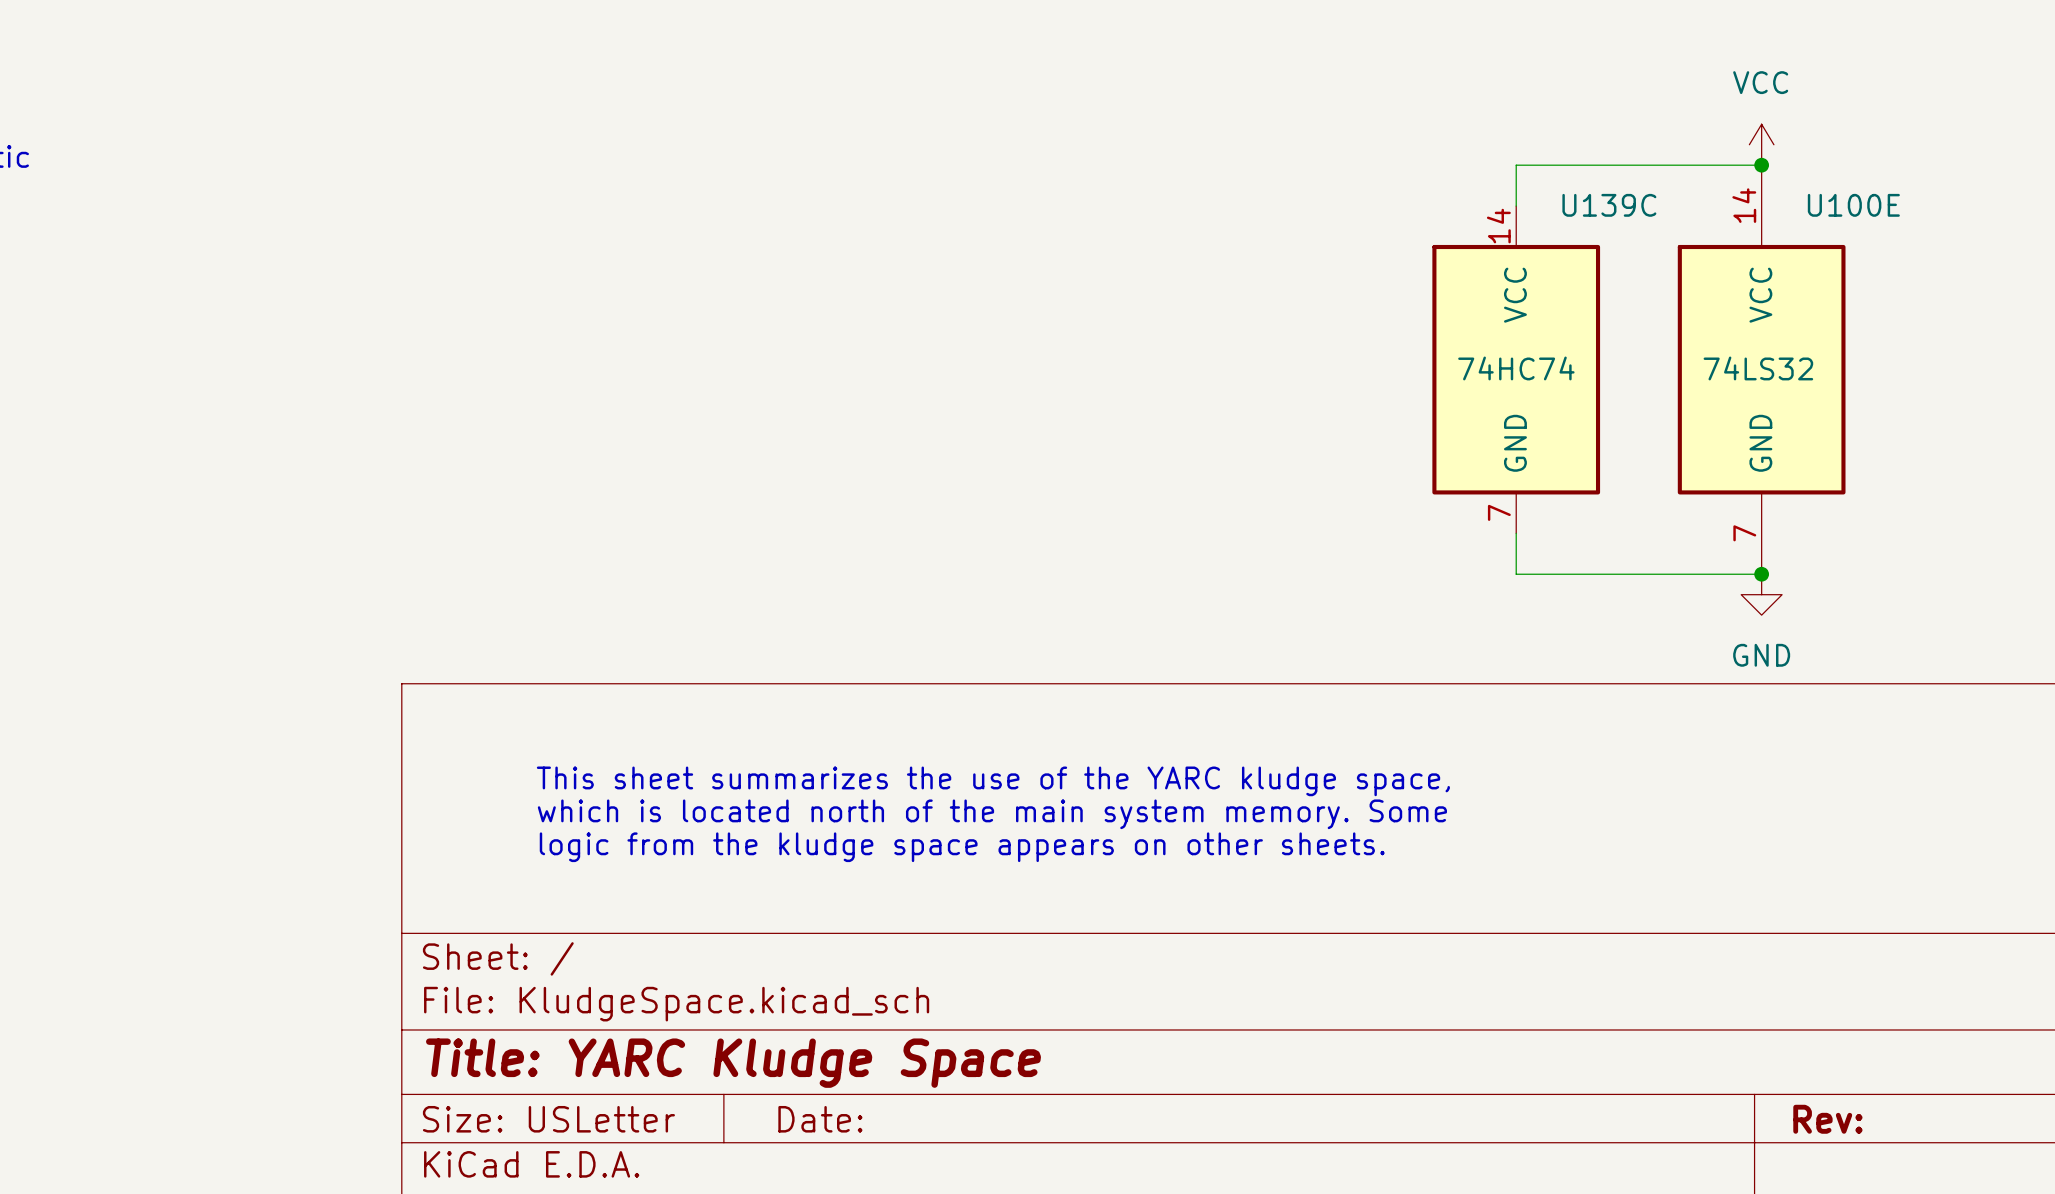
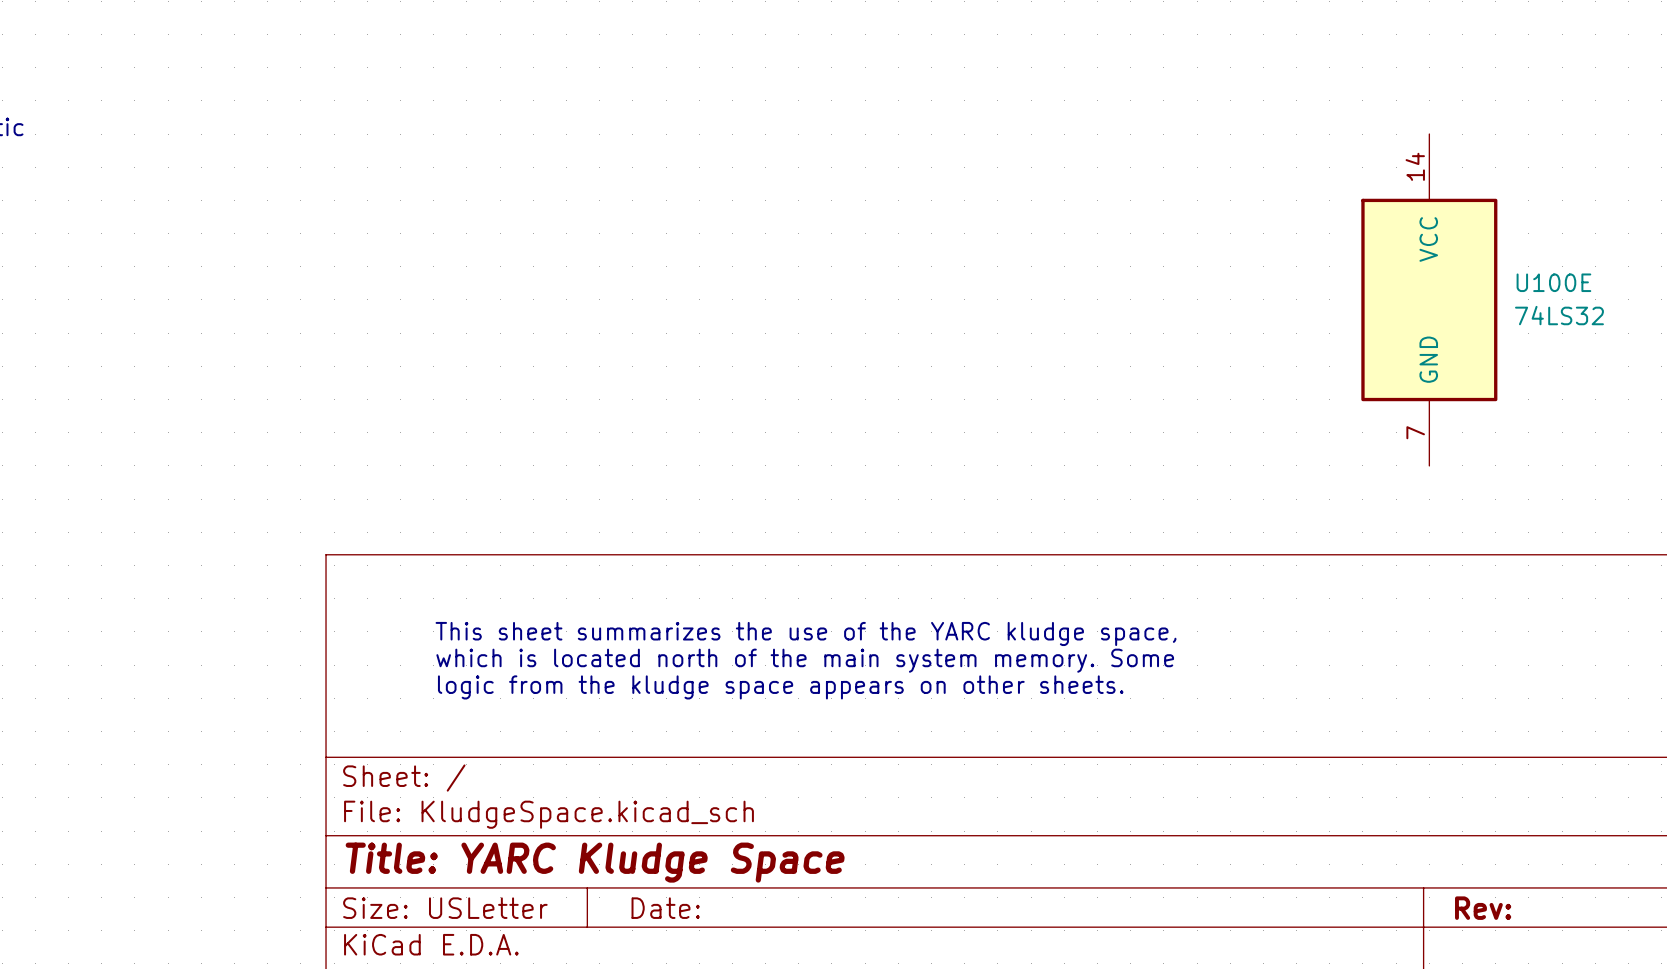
power symbol: VCC (1761, 144) -> none
wire: (1761, 165) (1516, 165) (1516, 206) -> none
junction: (1761, 165) -> none
U100E name position: U100E (1853, 205) -> U100E (1553, 282)
U100E value position: 74LS32 (1758, 368) -> 74LS32 (1559, 315)
U139C: 74HC74 (1516, 369) -> none
wire: (1516, 533) (1516, 574) (1761, 574) -> none
junction: (1761, 574) -> none
power symbol: GND (1761, 594) -> none

